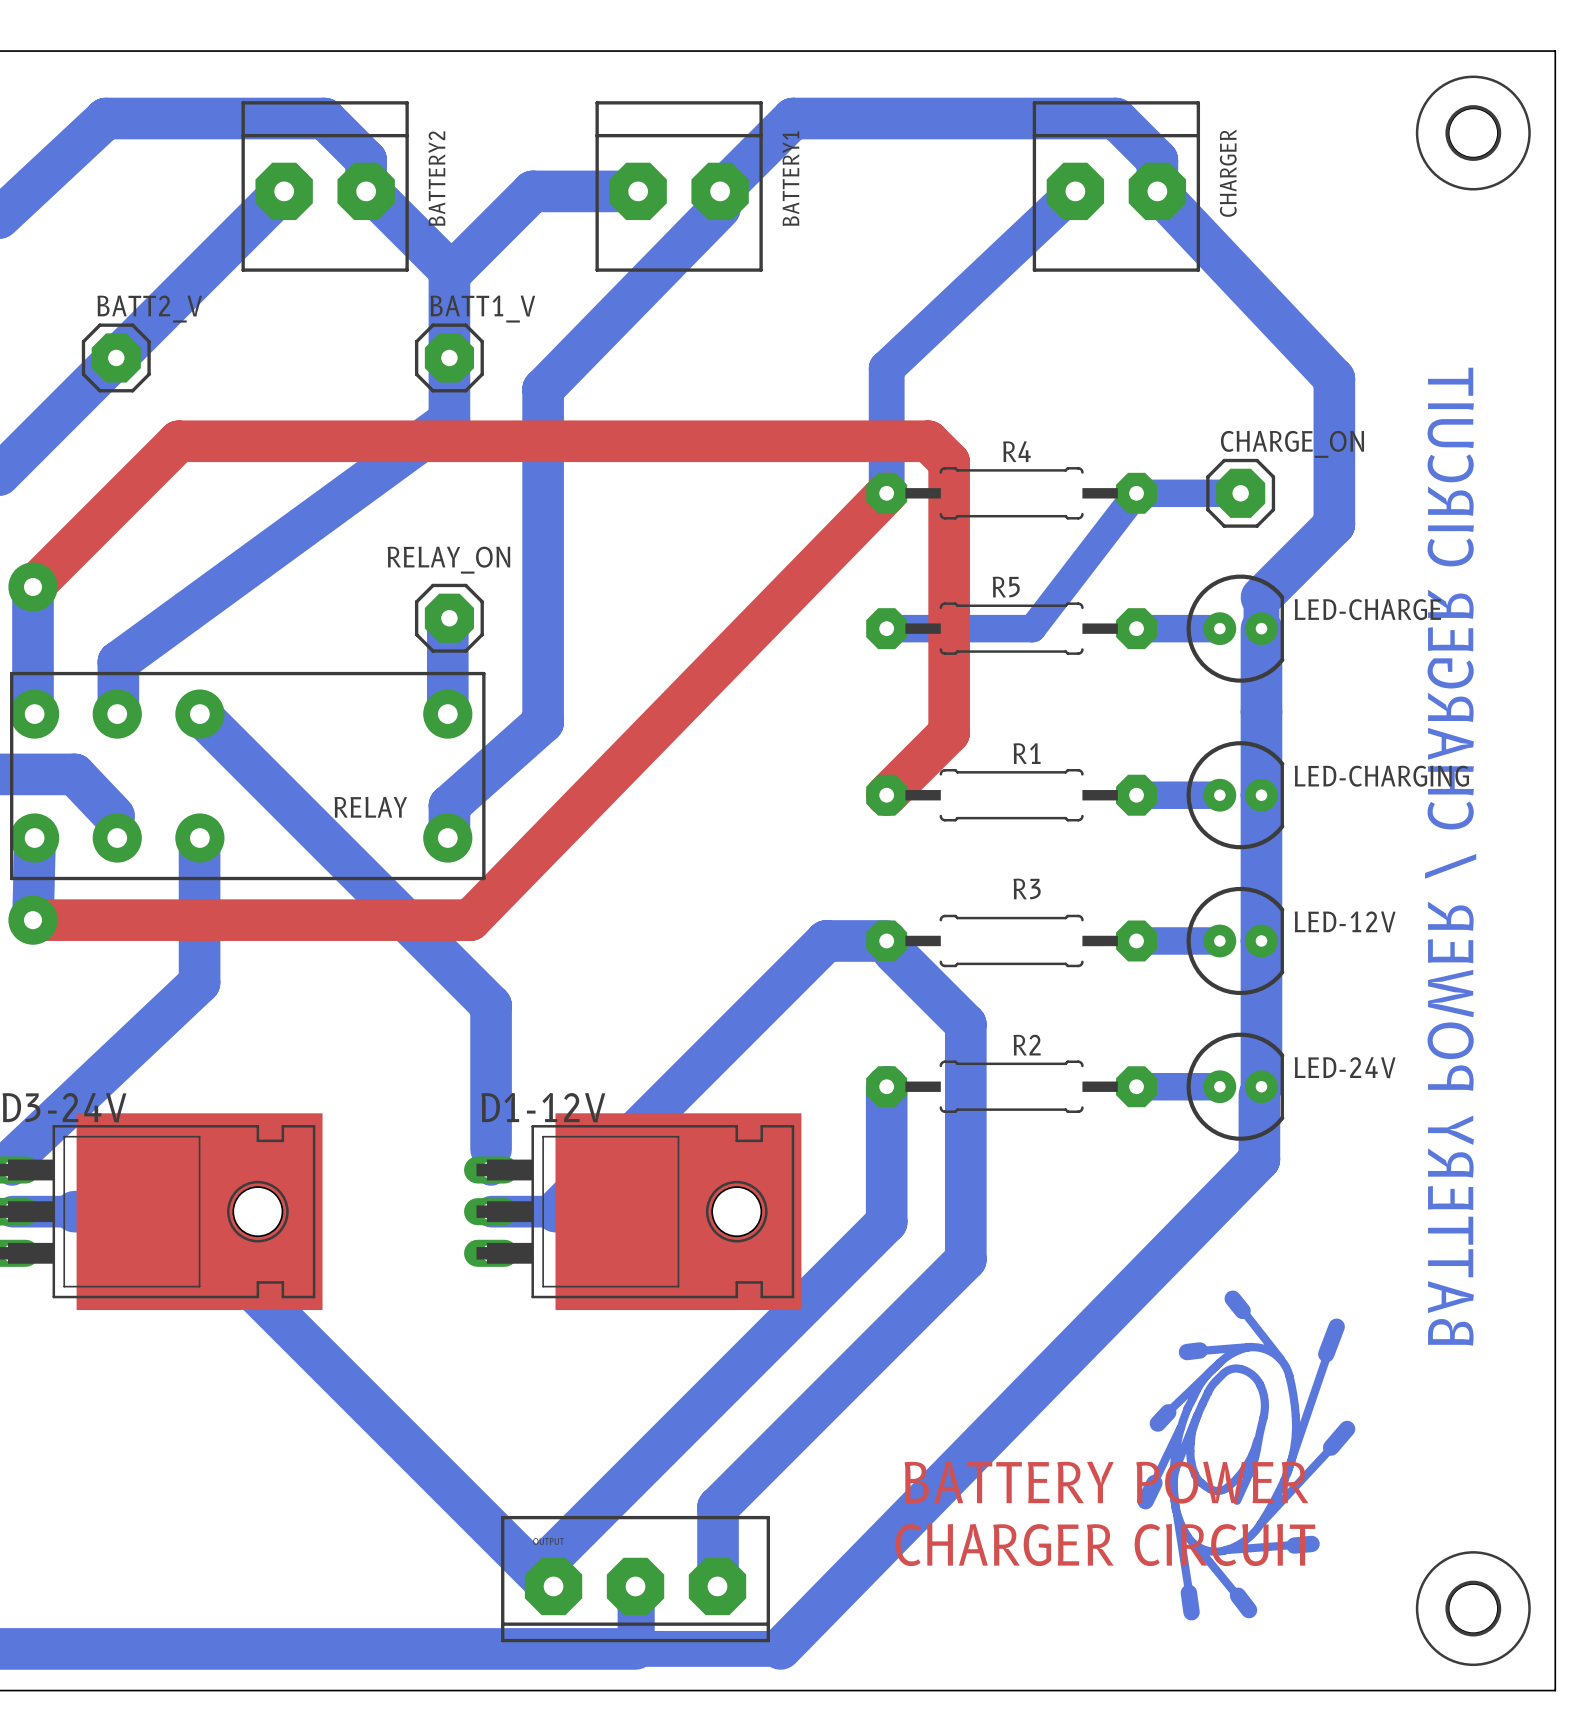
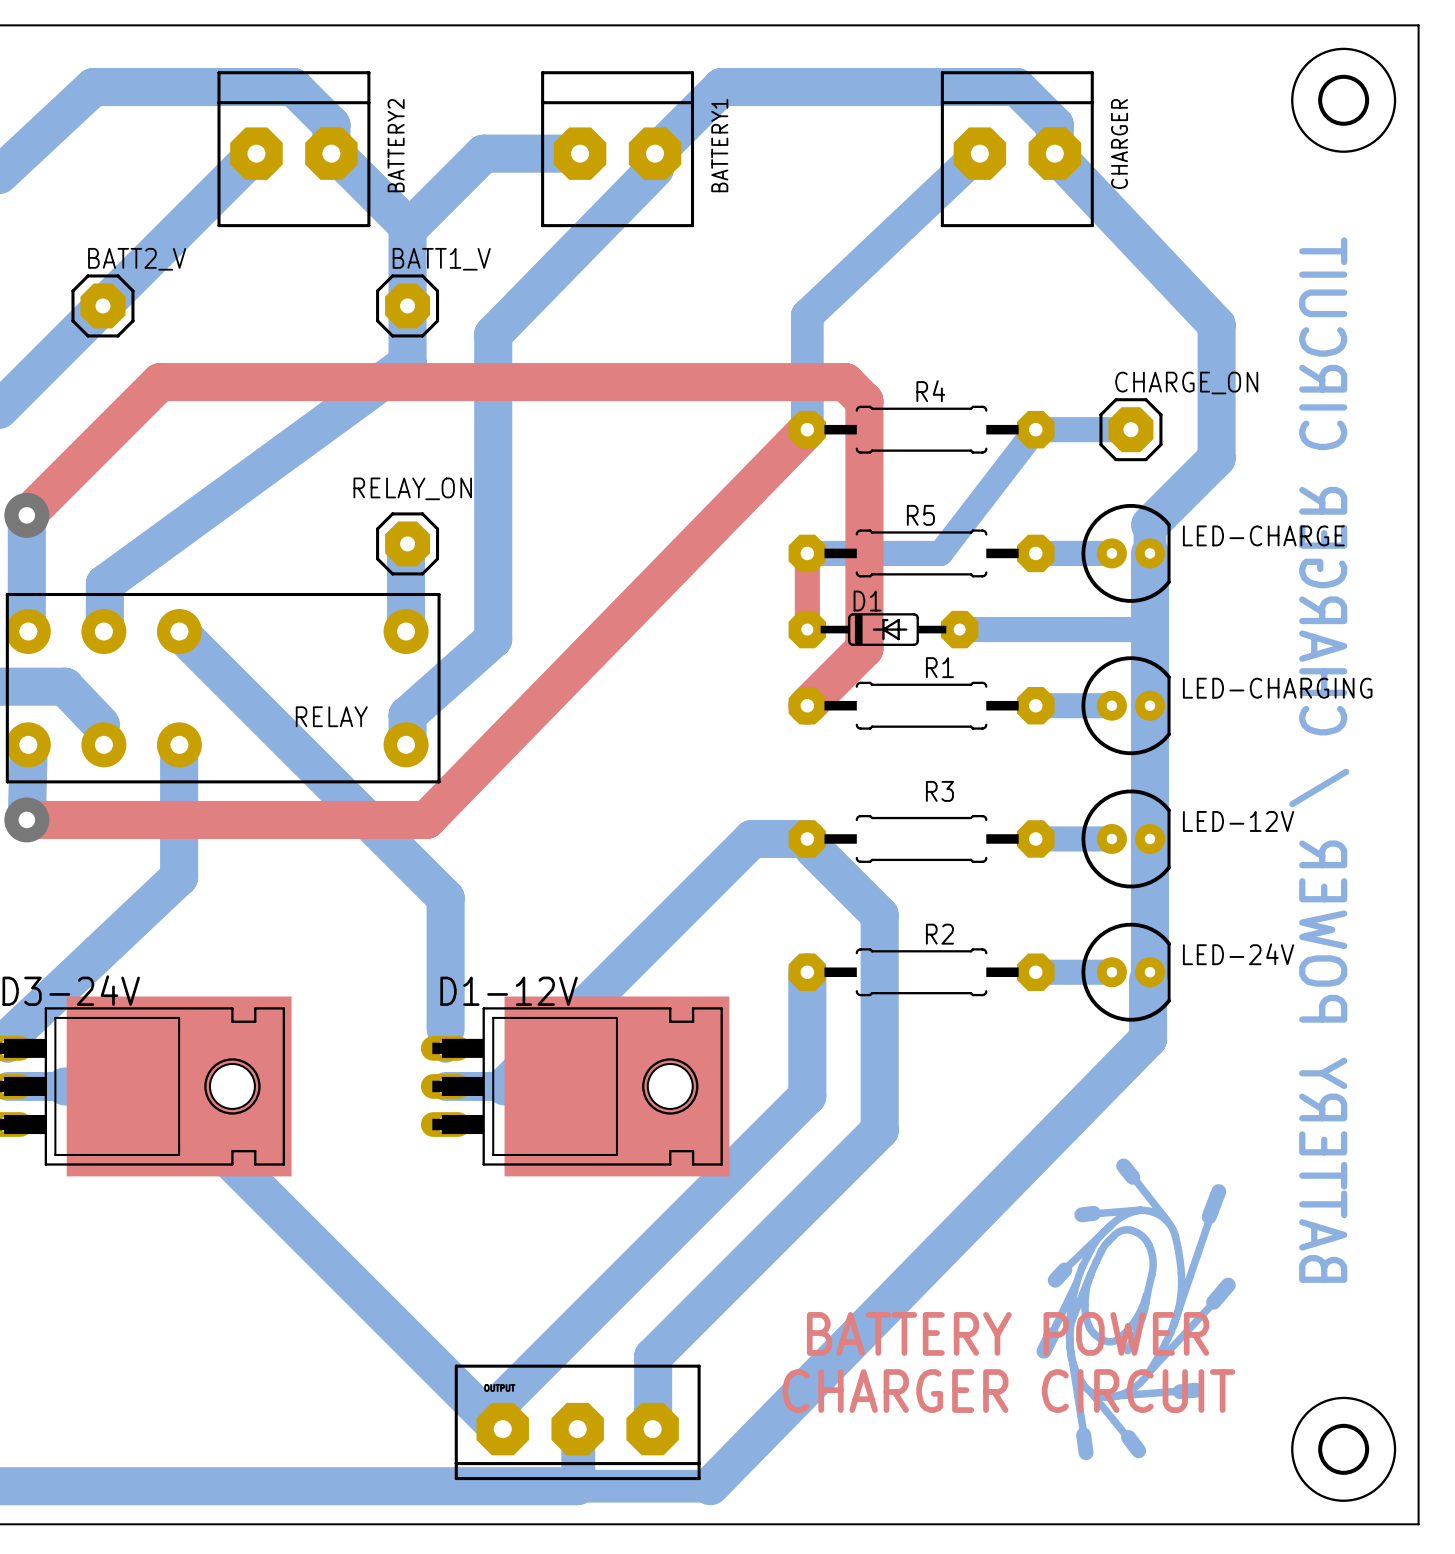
top track: none -> (807, 553) (807, 629)
D1: none -> (883, 629)
bottom track: none -> (959, 629) (1149, 629)

